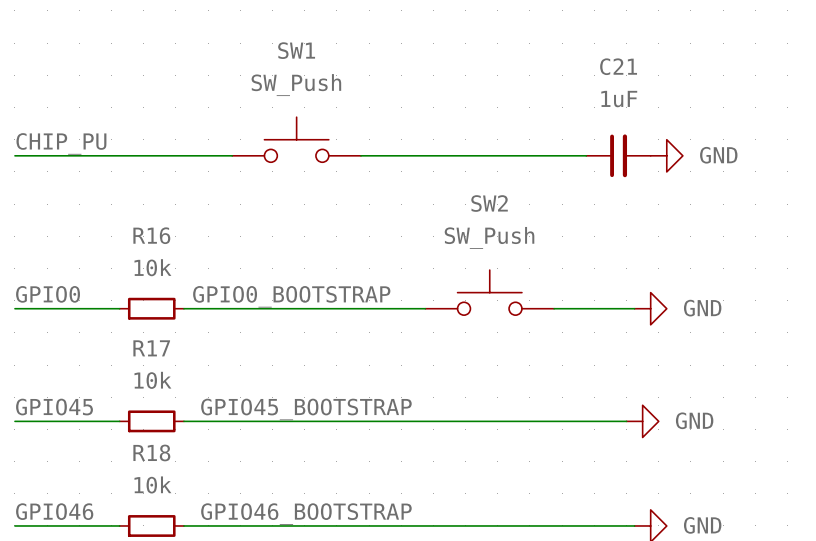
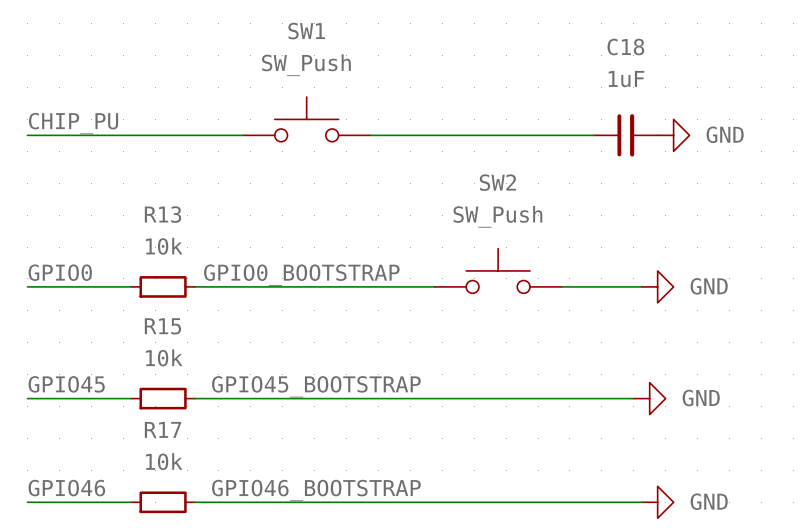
C21 name: C21 (618, 66) -> C18 (625, 47)
R16 name: R16 (151, 235) -> R13 (163, 214)
R17 name: R17 (151, 348) -> R15 (162, 326)
R18 name: R18 (151, 452) -> R17 (163, 429)

